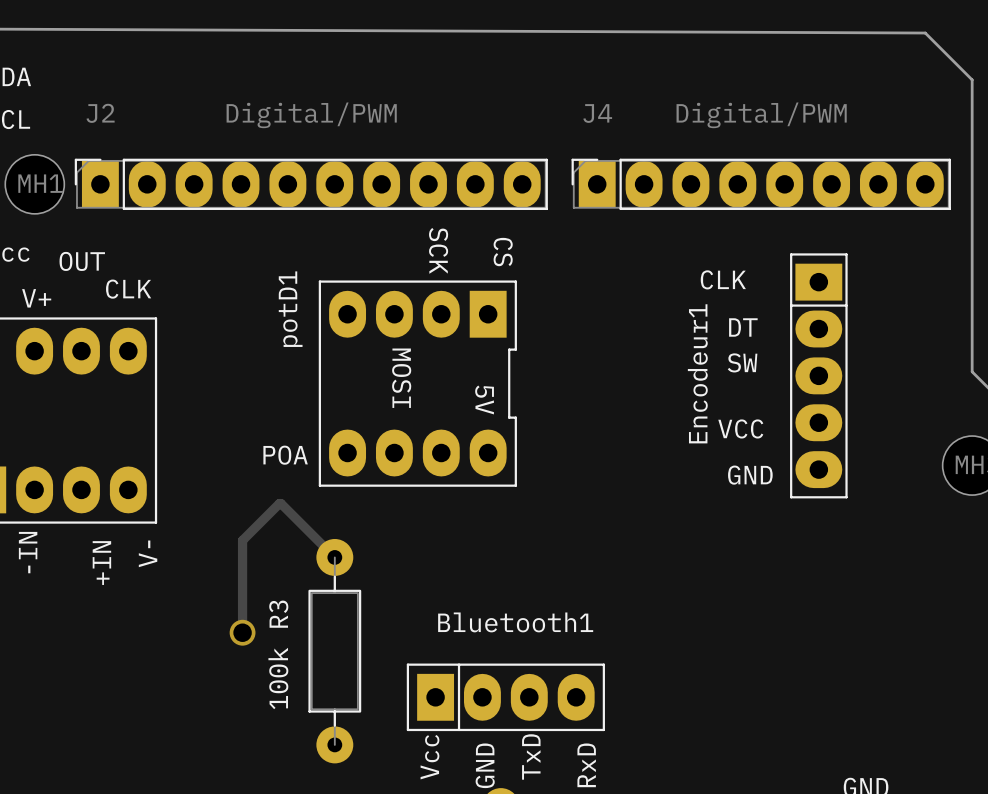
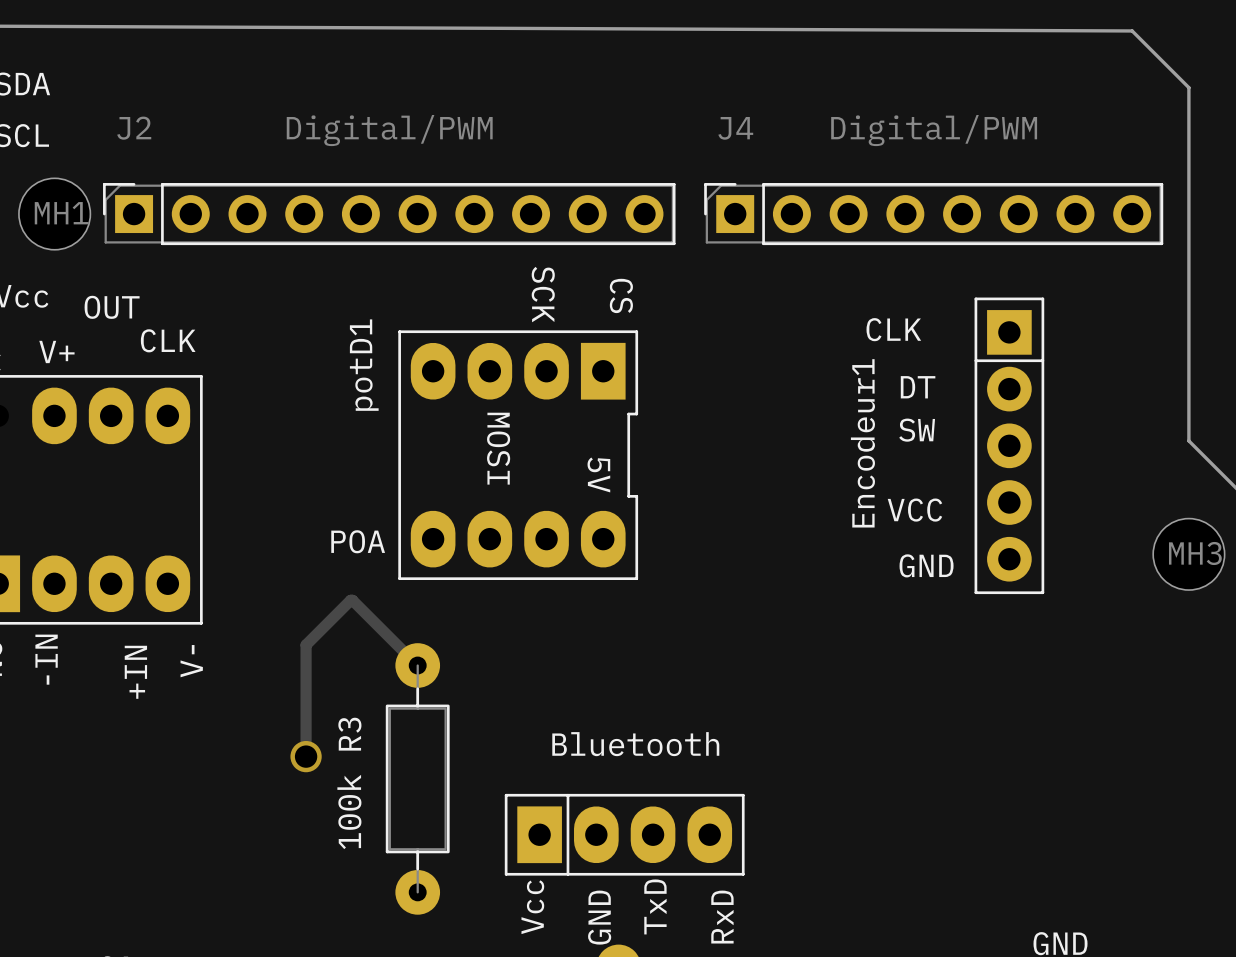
J2 footprint: [74, 158, 548, 210] -> [103, 183, 676, 246]
J4 footprint: [571, 158, 951, 210] -> [704, 183, 1164, 246]
Encodeur1 footprint: [790, 253, 848, 499] -> [974, 297, 1045, 595]
Bluetooth1 name: Bluetooth1 (515, 622) -> Bluetooth (635, 744)

